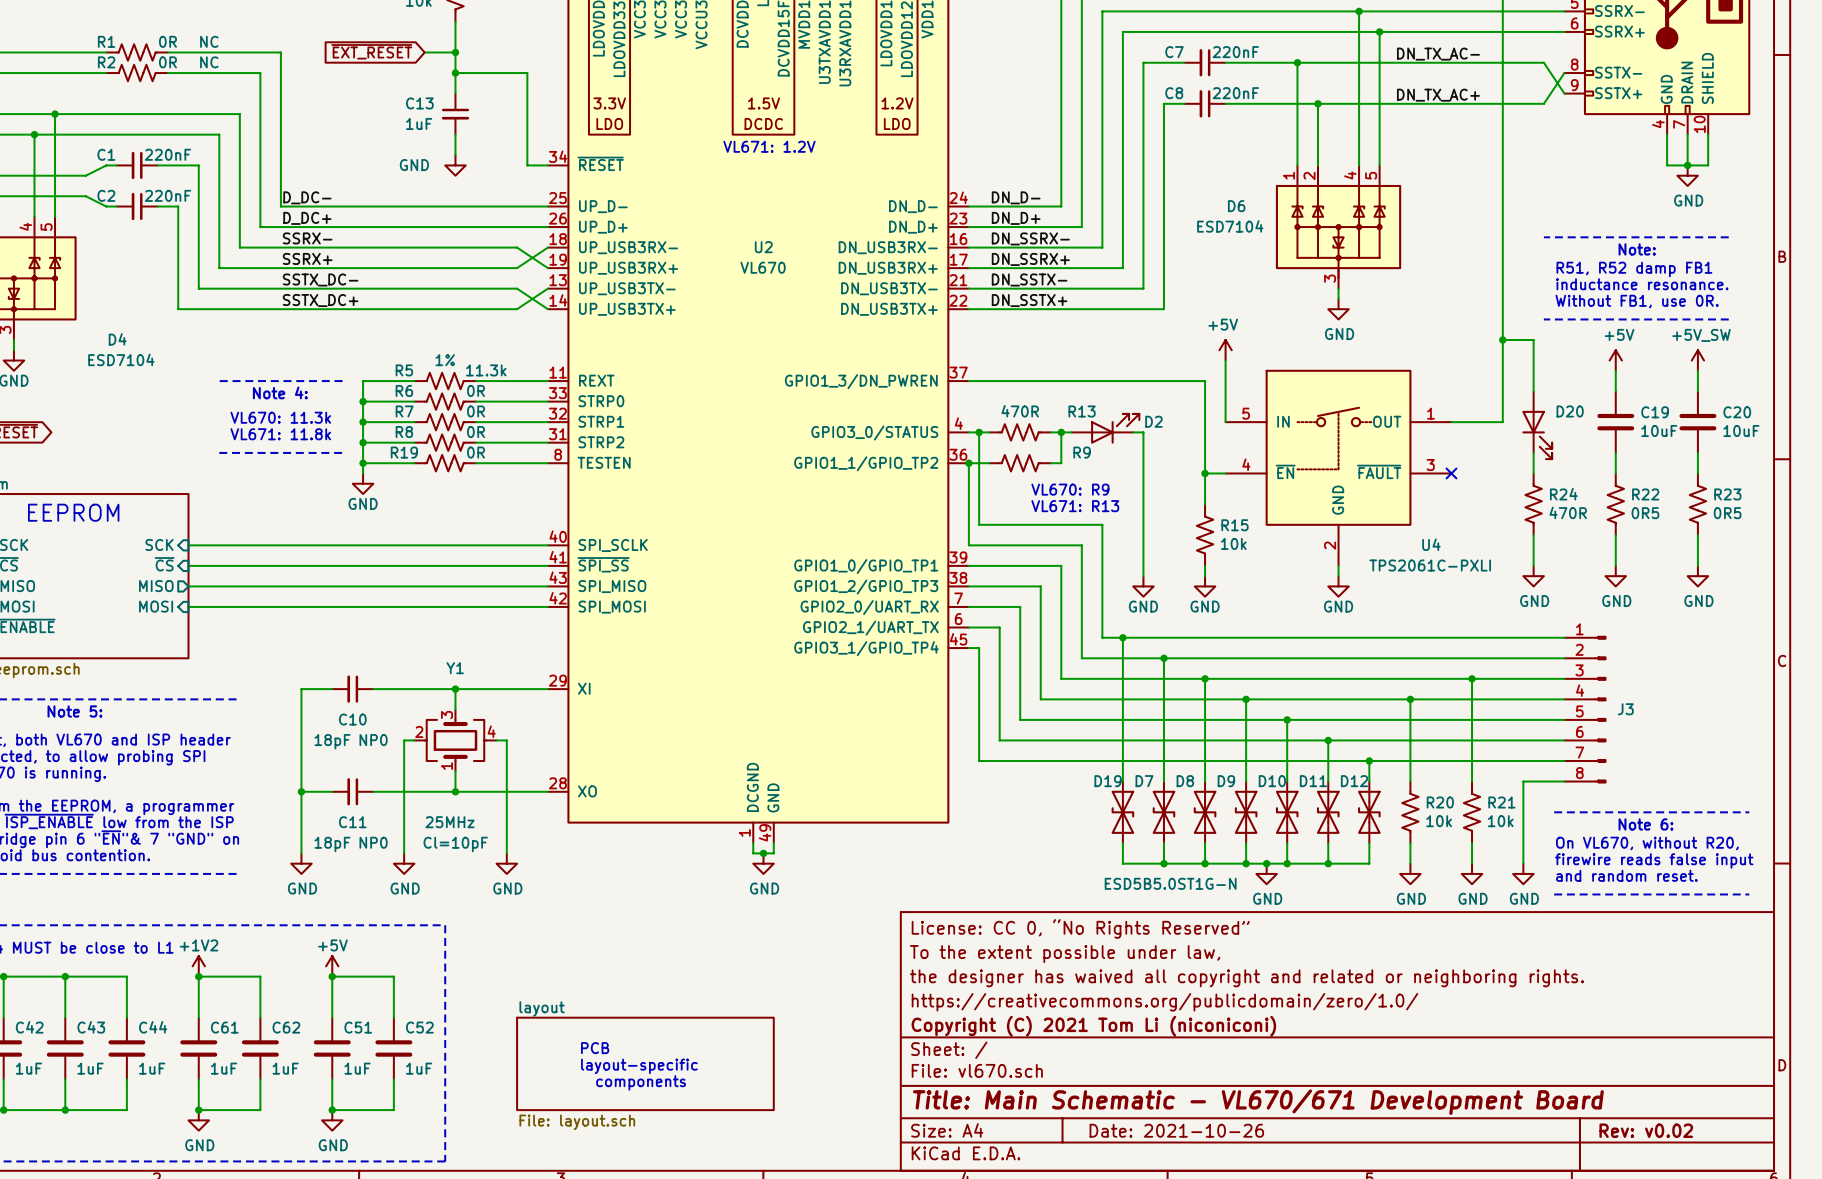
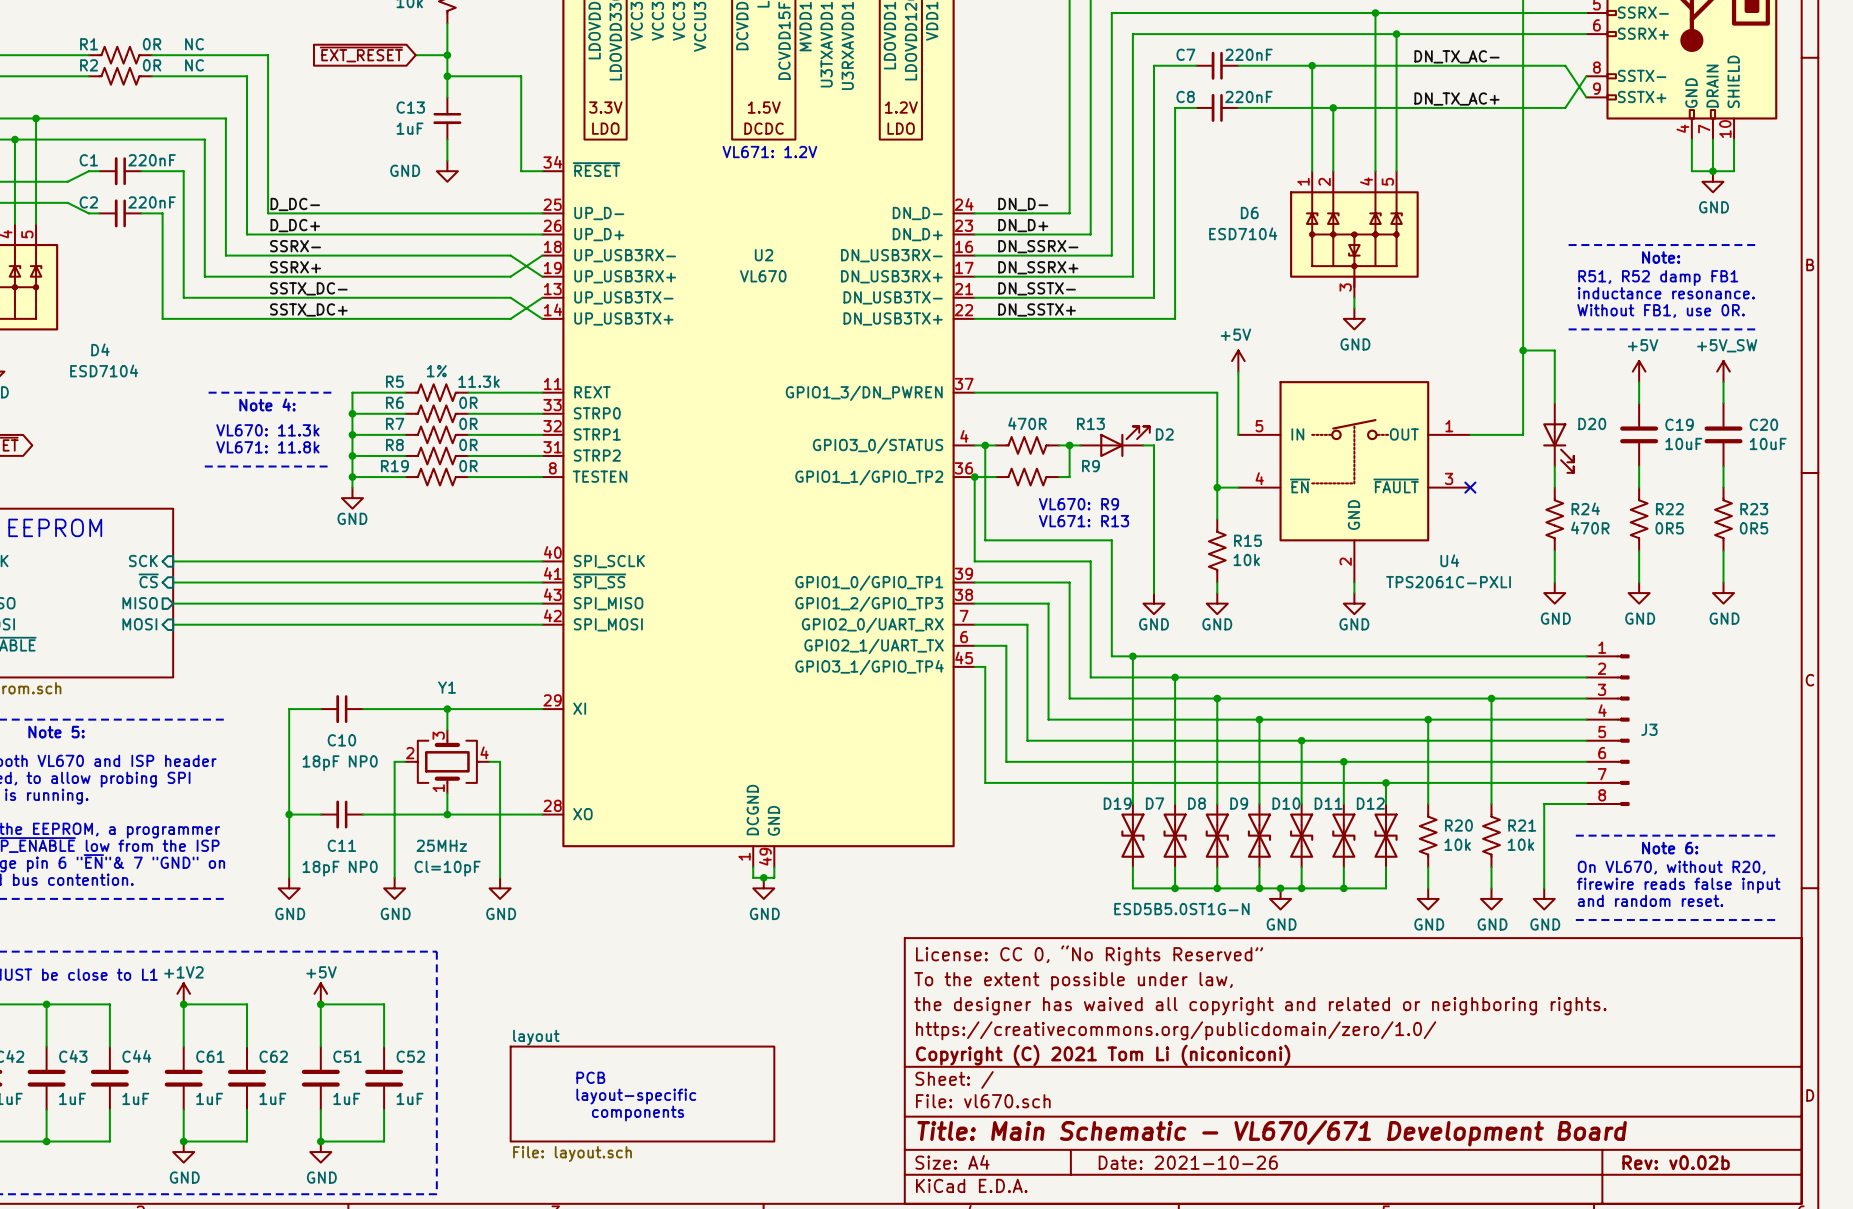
title block: Rev: v0.02 (1646, 1130) -> Rev: v0.02b (1676, 1162)

